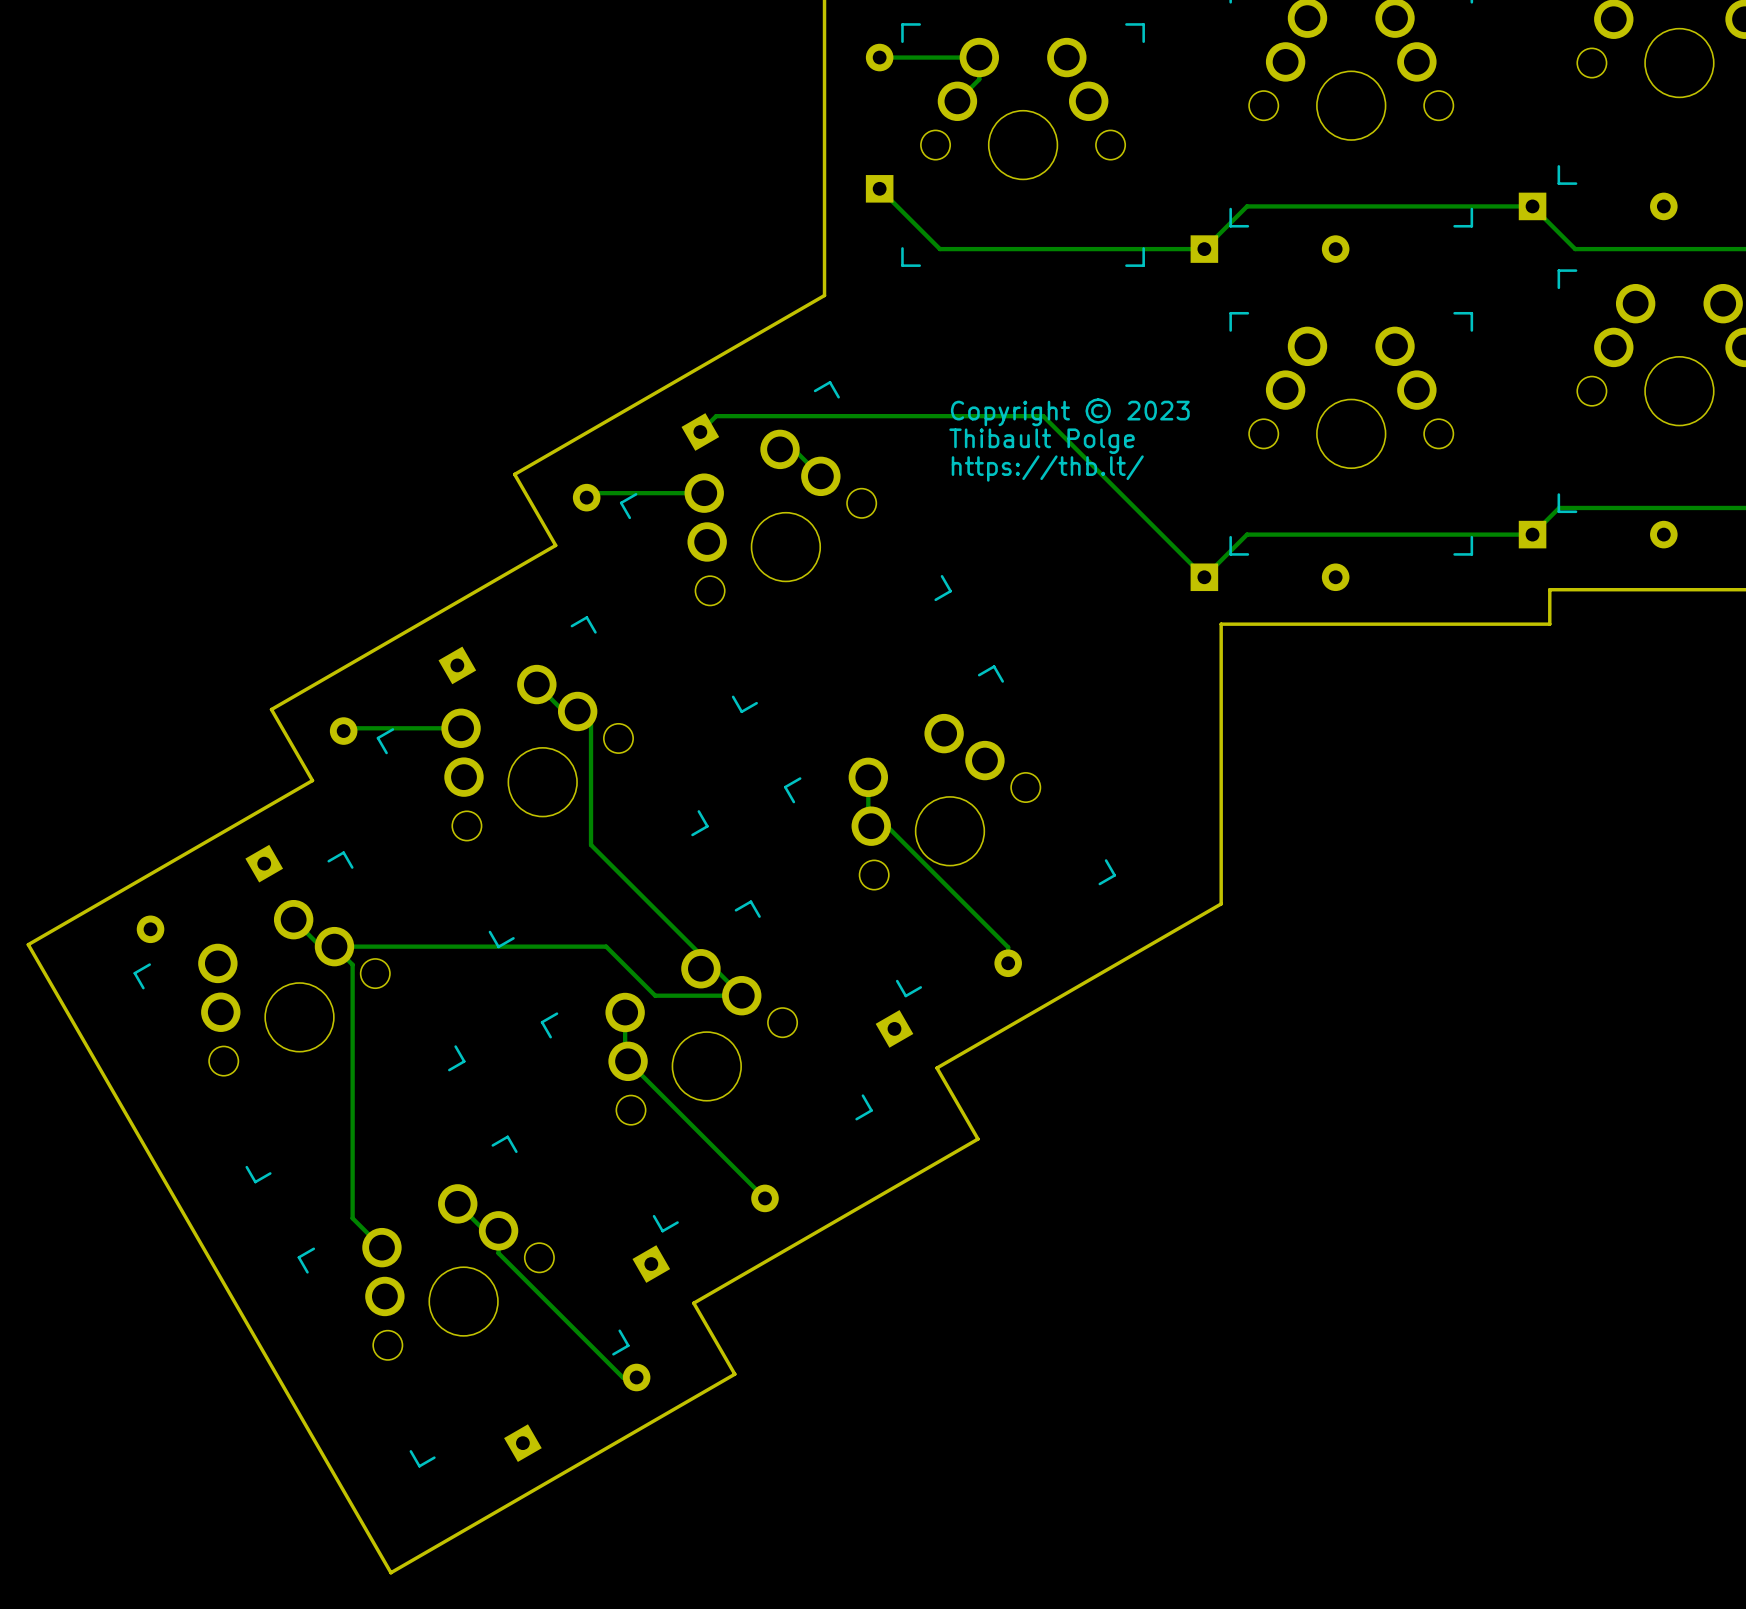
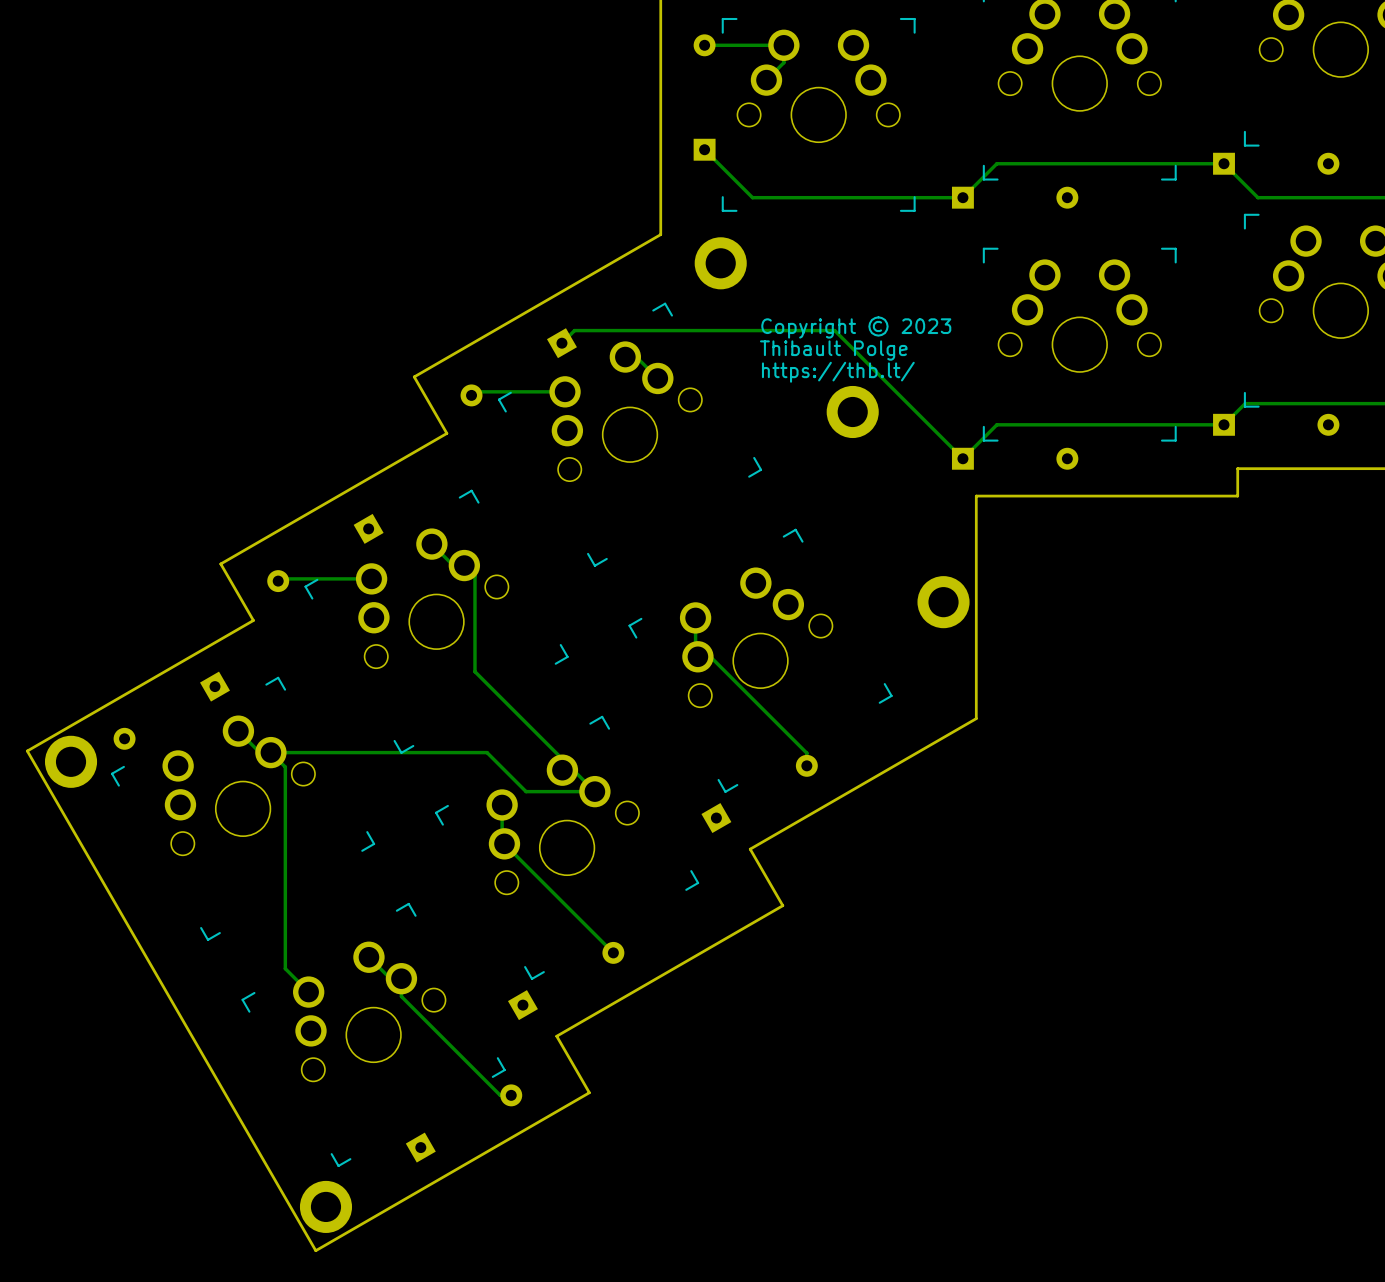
part: none -> (720, 263)
part: none -> (852, 411)
part: none -> (943, 602)
part: none -> (71, 761)
part: none -> (325, 1206)

